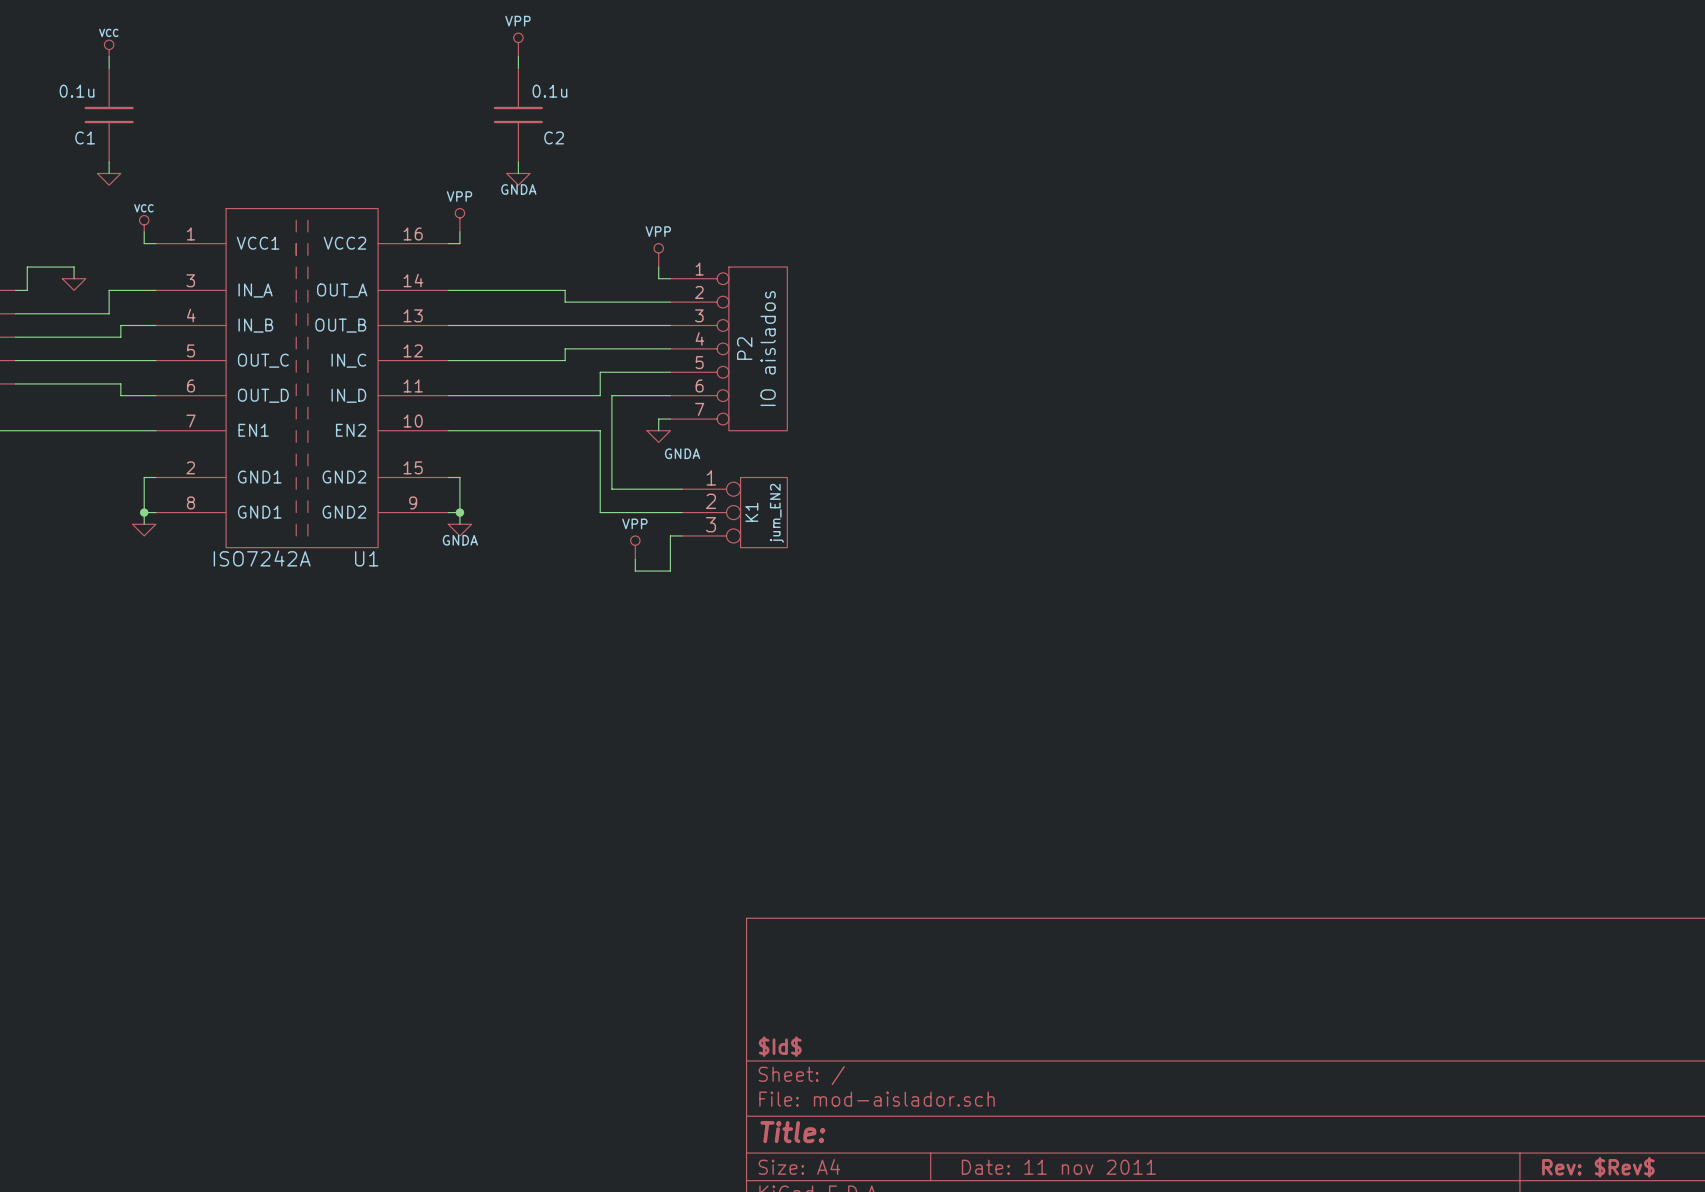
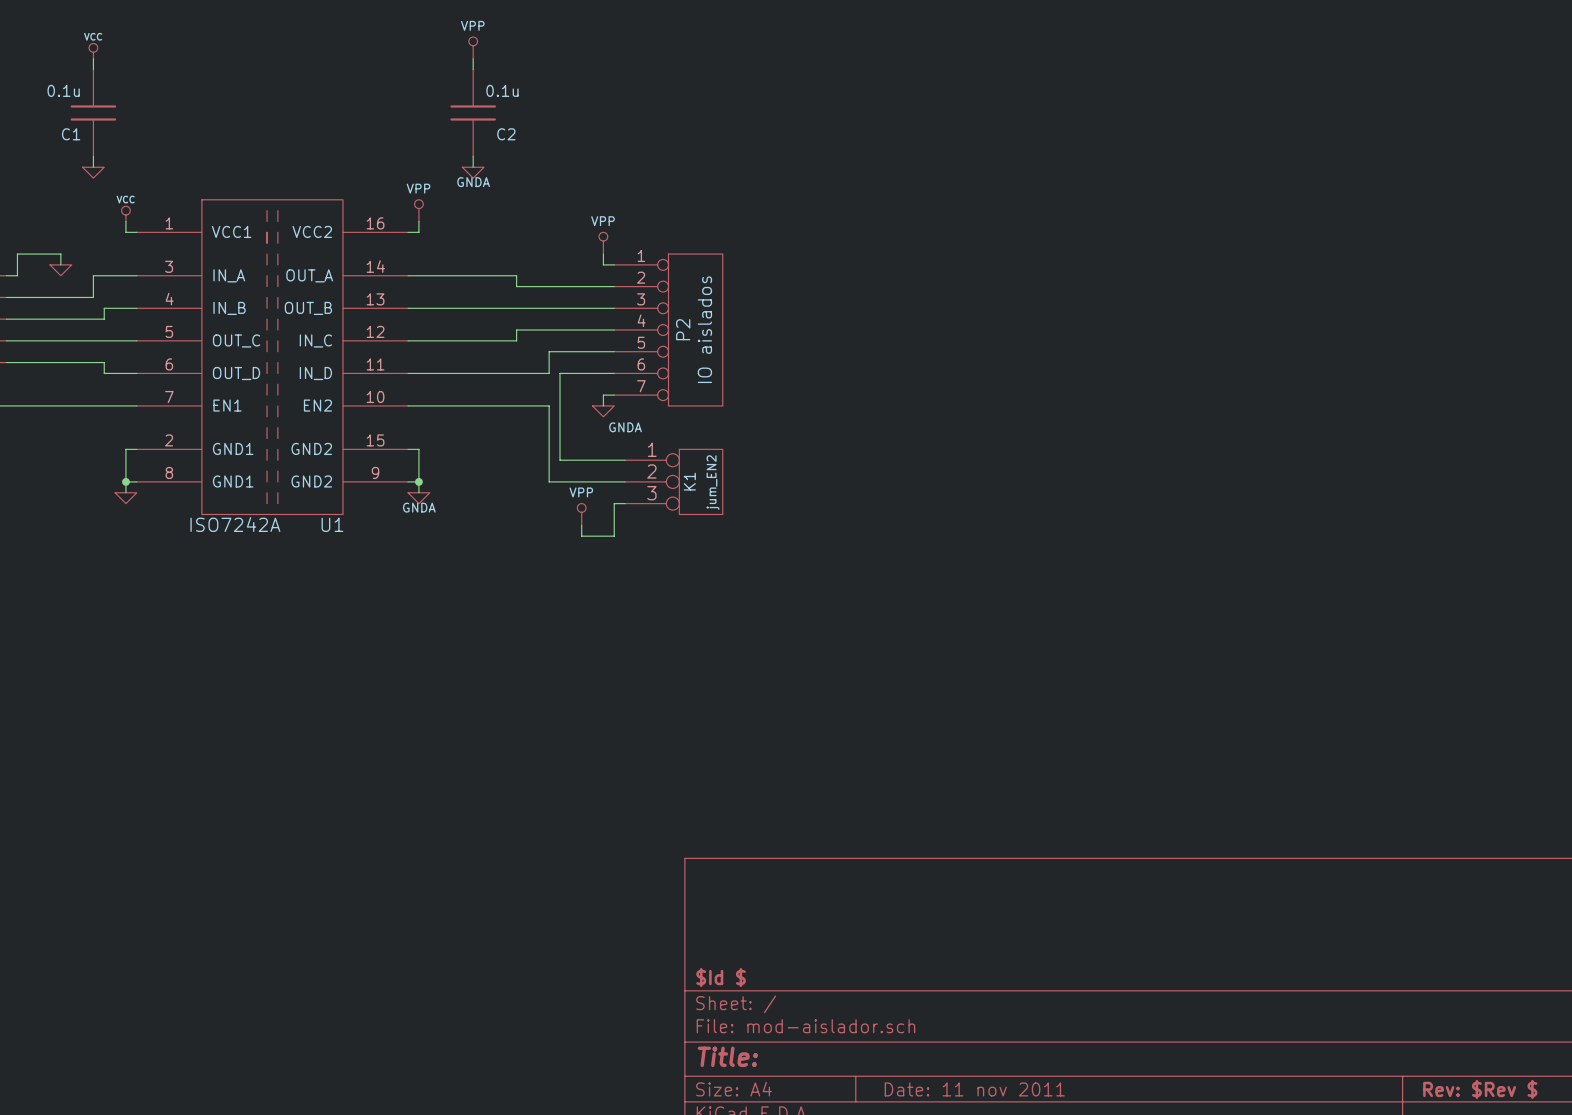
title block: $Id$ (780, 1046) -> $Id $ (721, 977)
title block: Rev: $Rev$ (1598, 1167) -> Rev: $Rev $ (1480, 1089)

